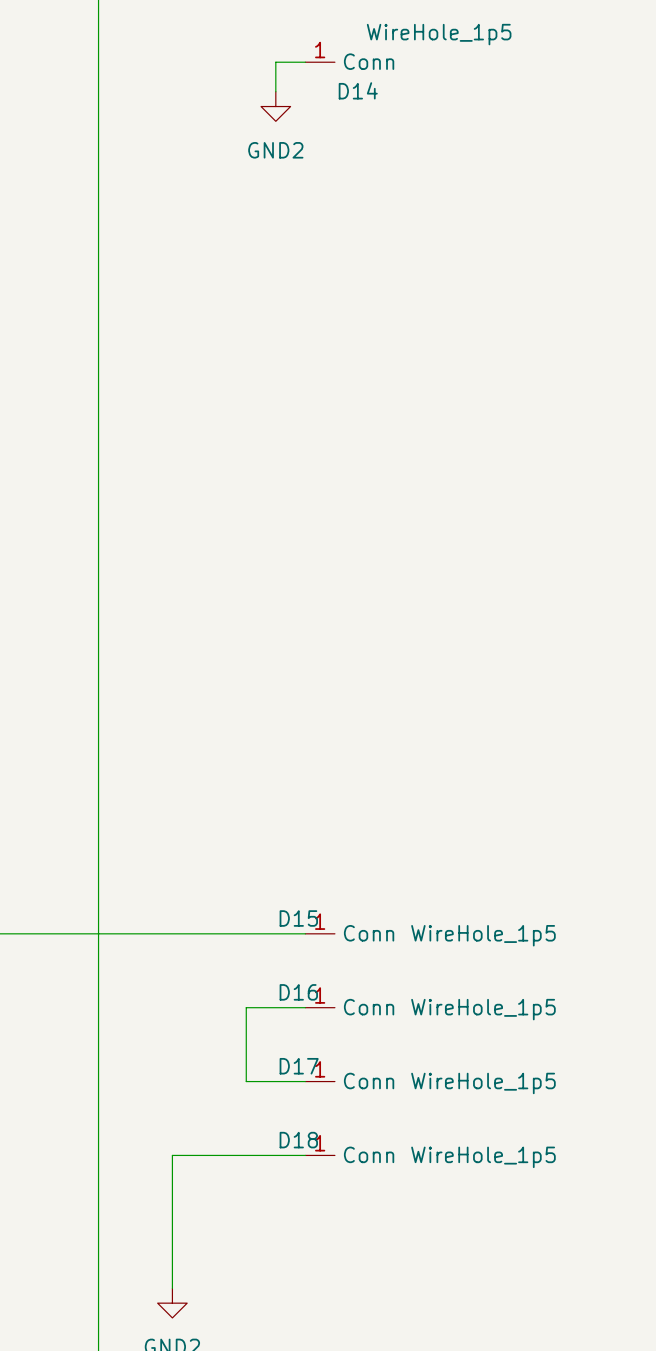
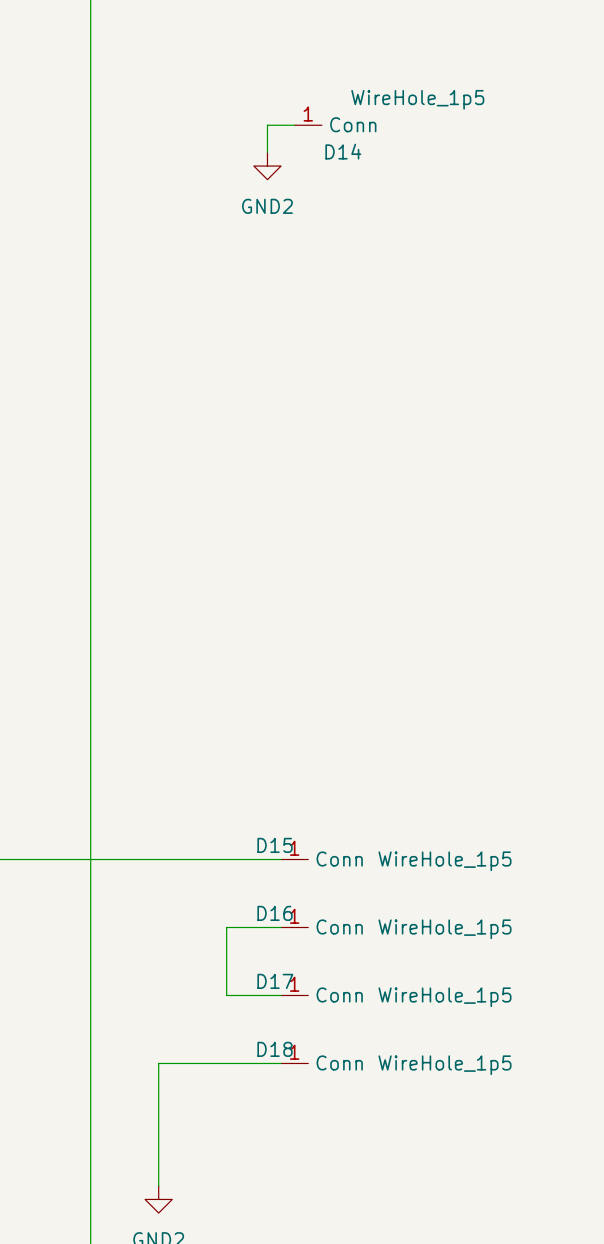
wire: (305, 62) (275, 62) (275, 91) -> (294, 125) (267, 125) (267, 152)
D14 position: (320, 62) -> (308, 125)
power symbol position: GND2 (275, 106) -> GND2 (267, 166)

